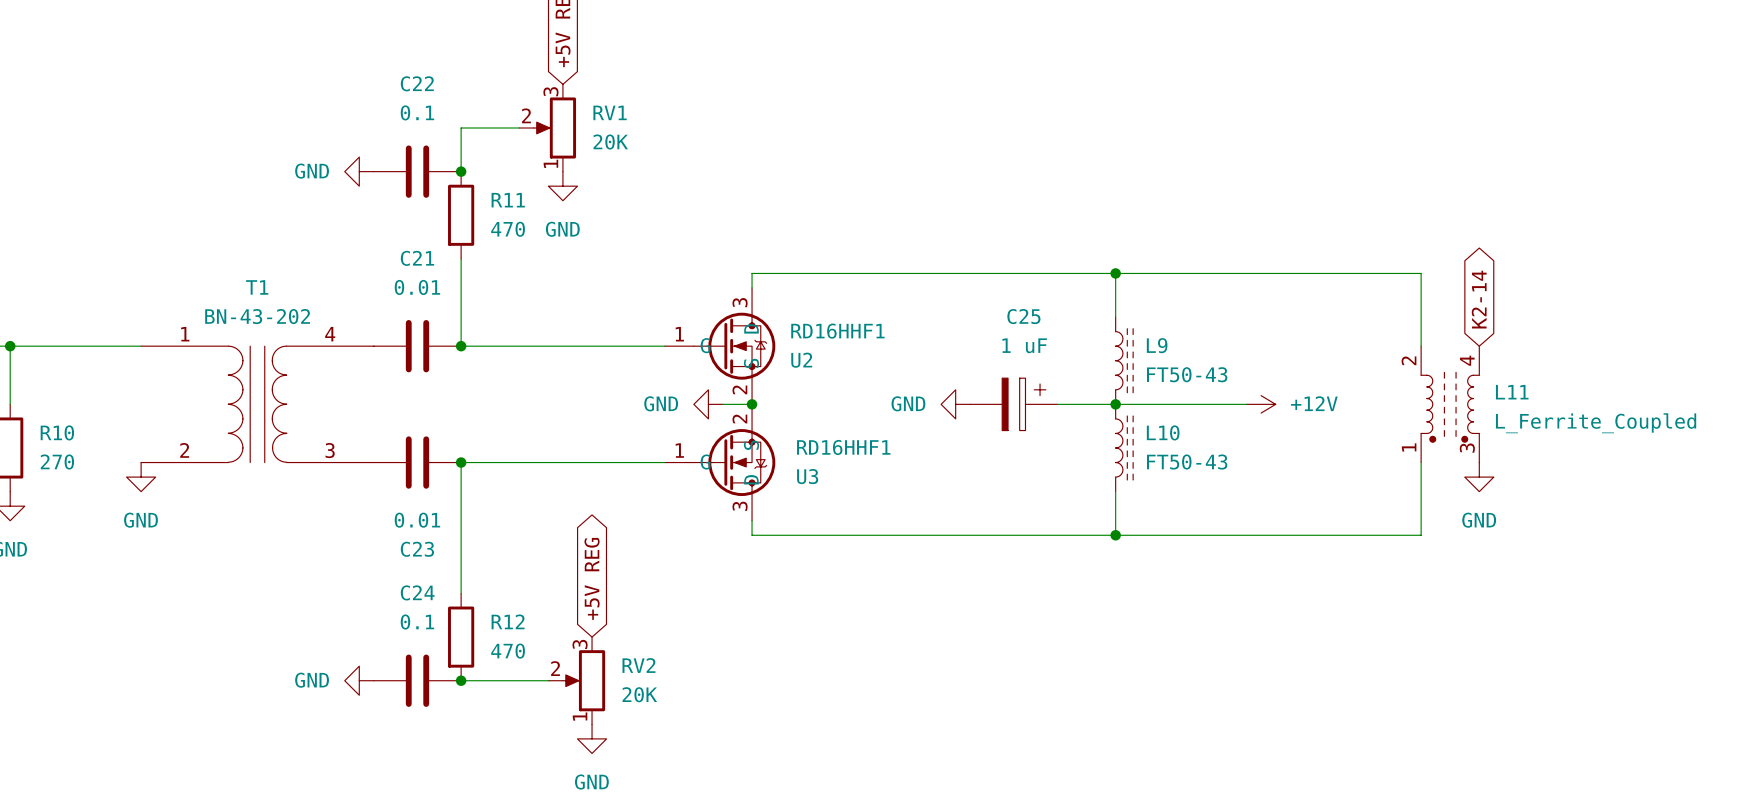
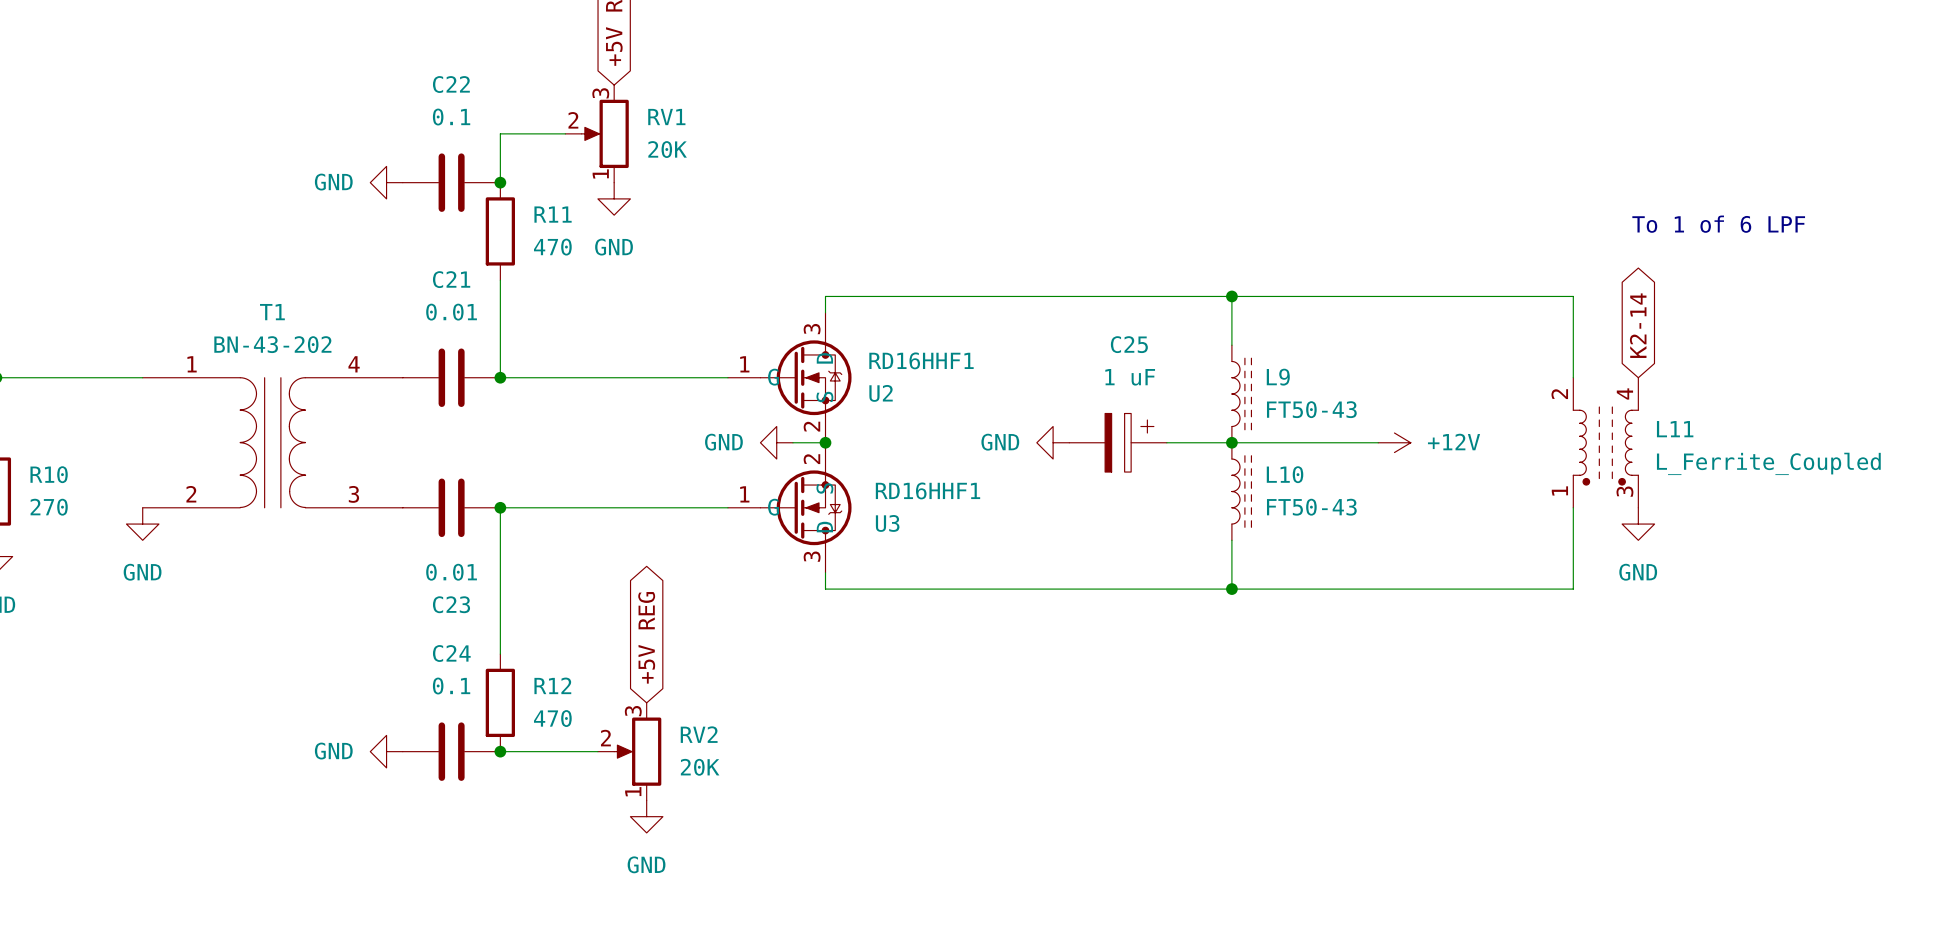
text: none -> To 1 of 6 LPF (1718, 224)

